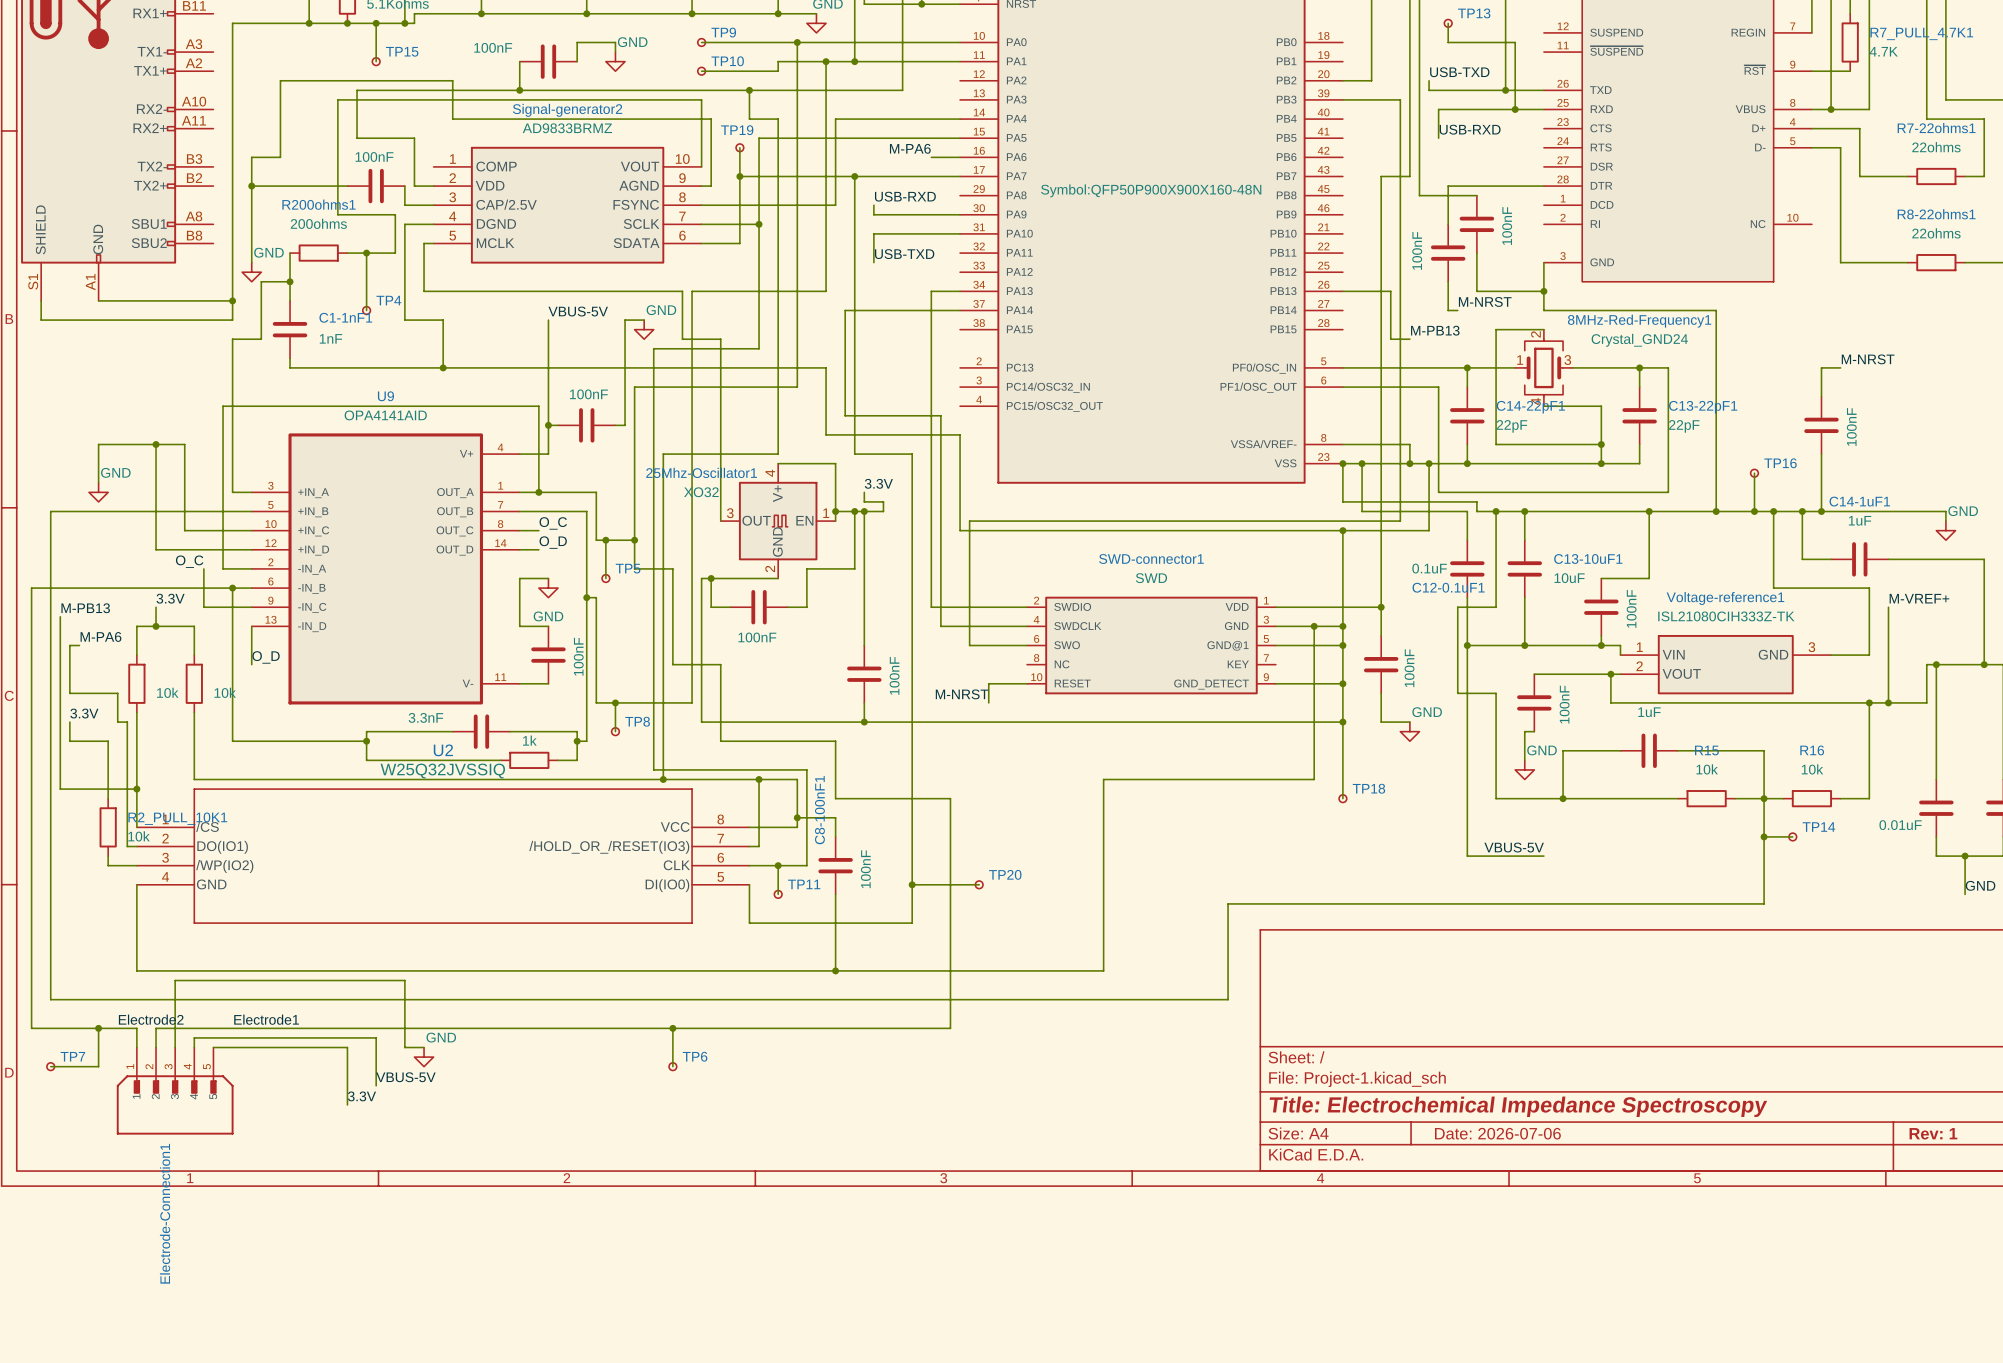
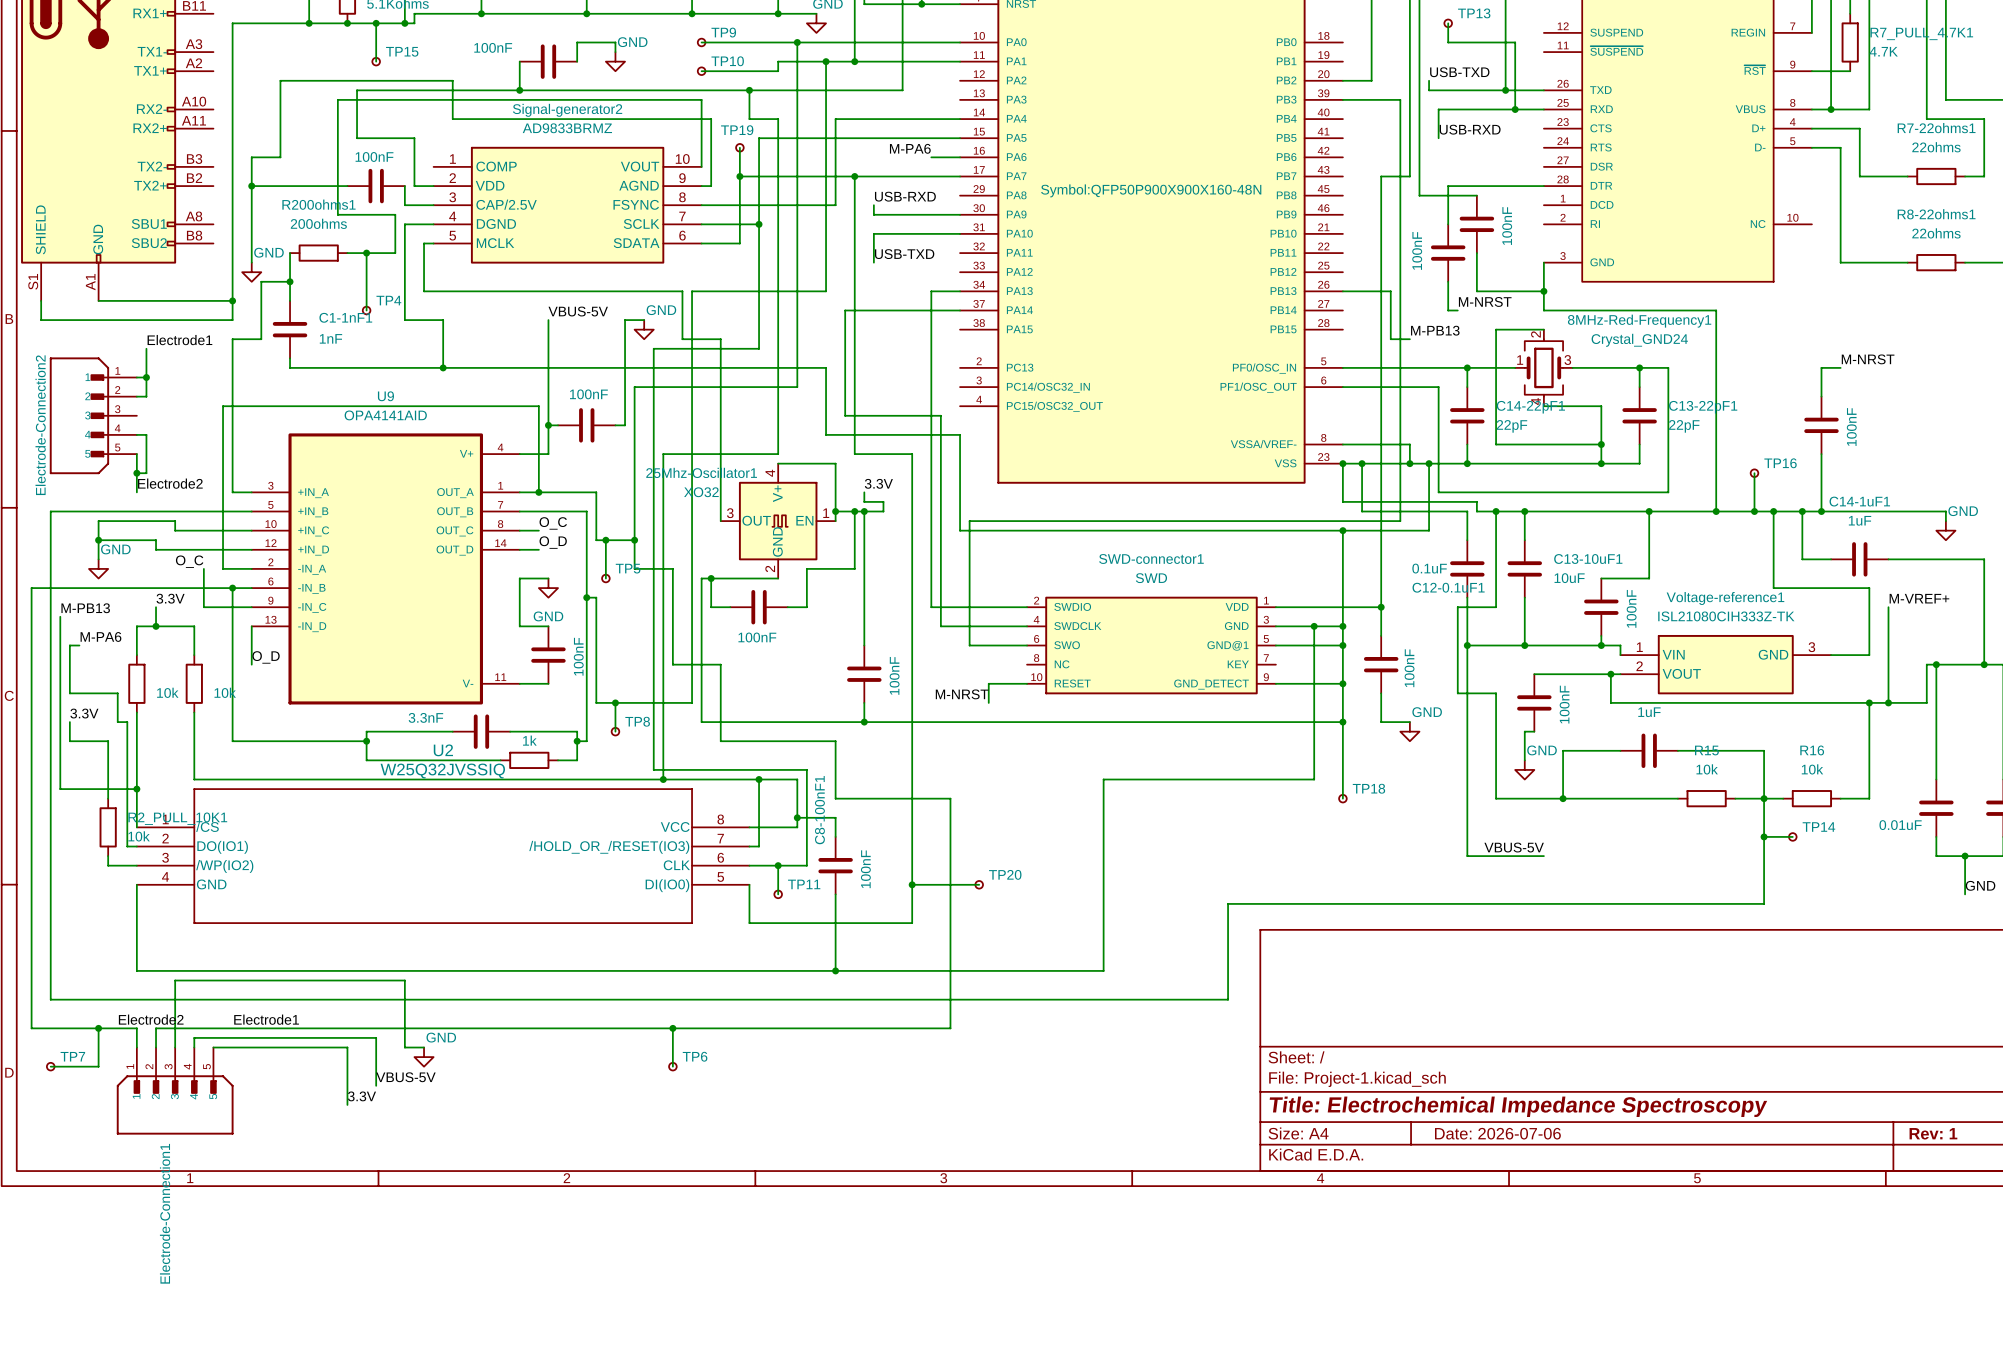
label: none -> Electrode1 (179, 340)
wire: none -> (146, 348) (146, 396) (136, 396)
wire: none -> (136, 377) (146, 377)
junction: none -> (146, 377)
Electrode-Connection2: none -> (93, 415)
wire: none -> (136, 434) (146, 434) (146, 473) (136, 473)
wire: (156, 444) (156, 540) -> (98, 540) (156, 540)
junction: (156, 444) -> none
wire: none -> (136, 454) (136, 492)
junction: none -> (136, 473)
wire: (98, 482) (98, 444) (184, 444) (184, 530) -> (98, 559) (98, 521) (175, 521) (175, 530) (184, 530)
label: none -> Electrode2 (170, 483)
power symbol position: GND (98, 492) -> GND (98, 568)
junction: none -> (98, 540)

